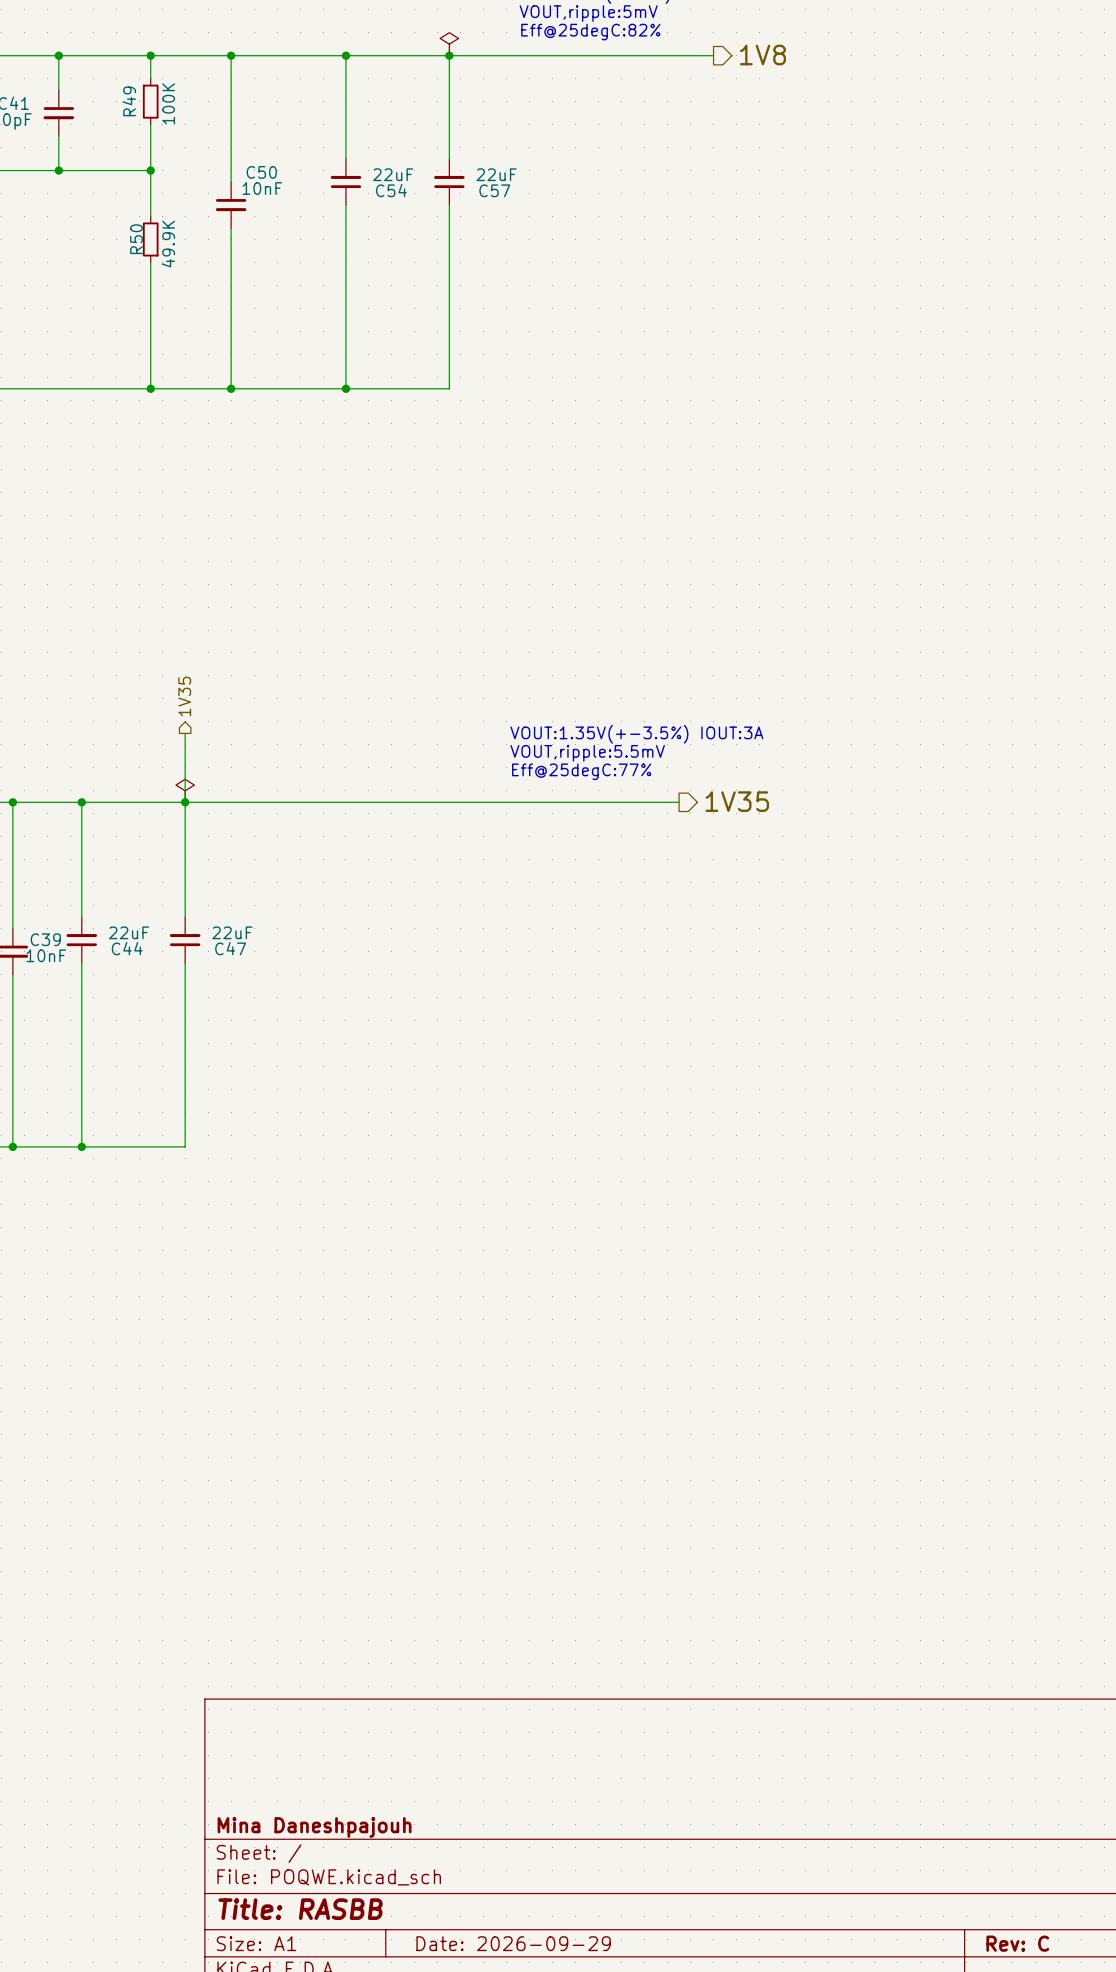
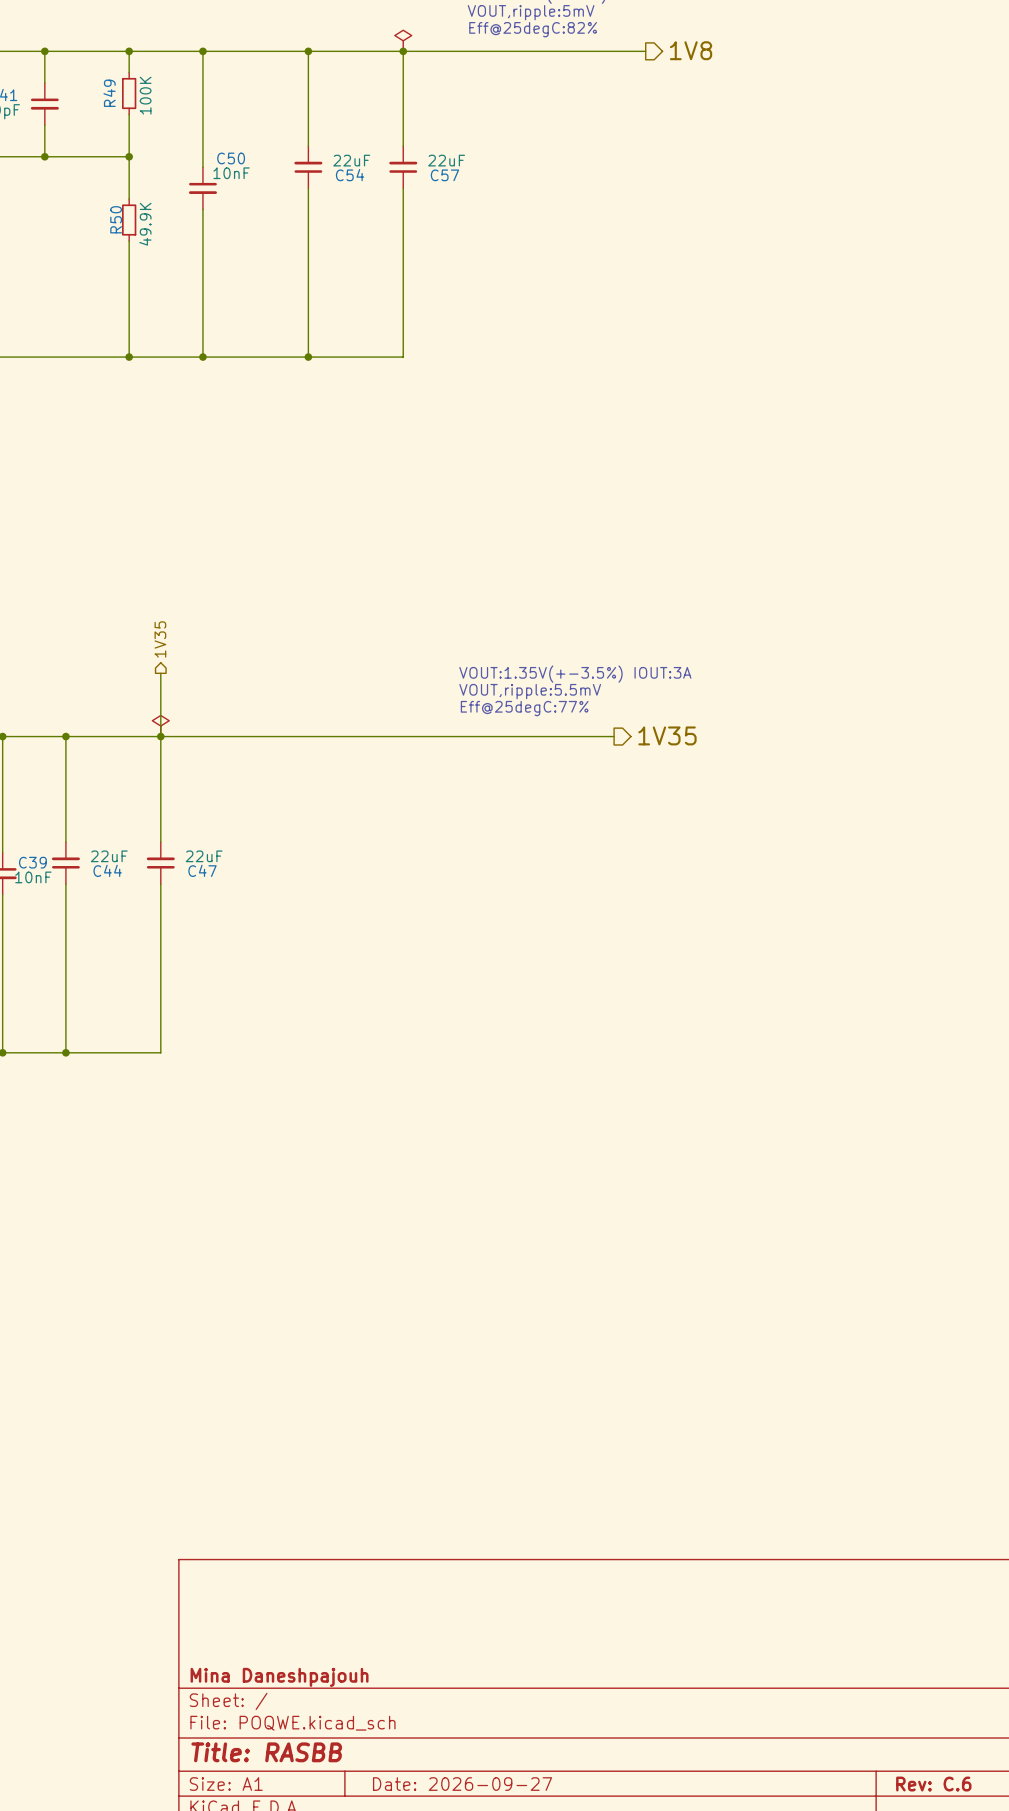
title block: Date: 2026-09-29 (513, 1943) -> Date: 2026-09-27 (462, 1784)
title block: Rev: C (1017, 1943) -> Rev: C.6 (933, 1784)

